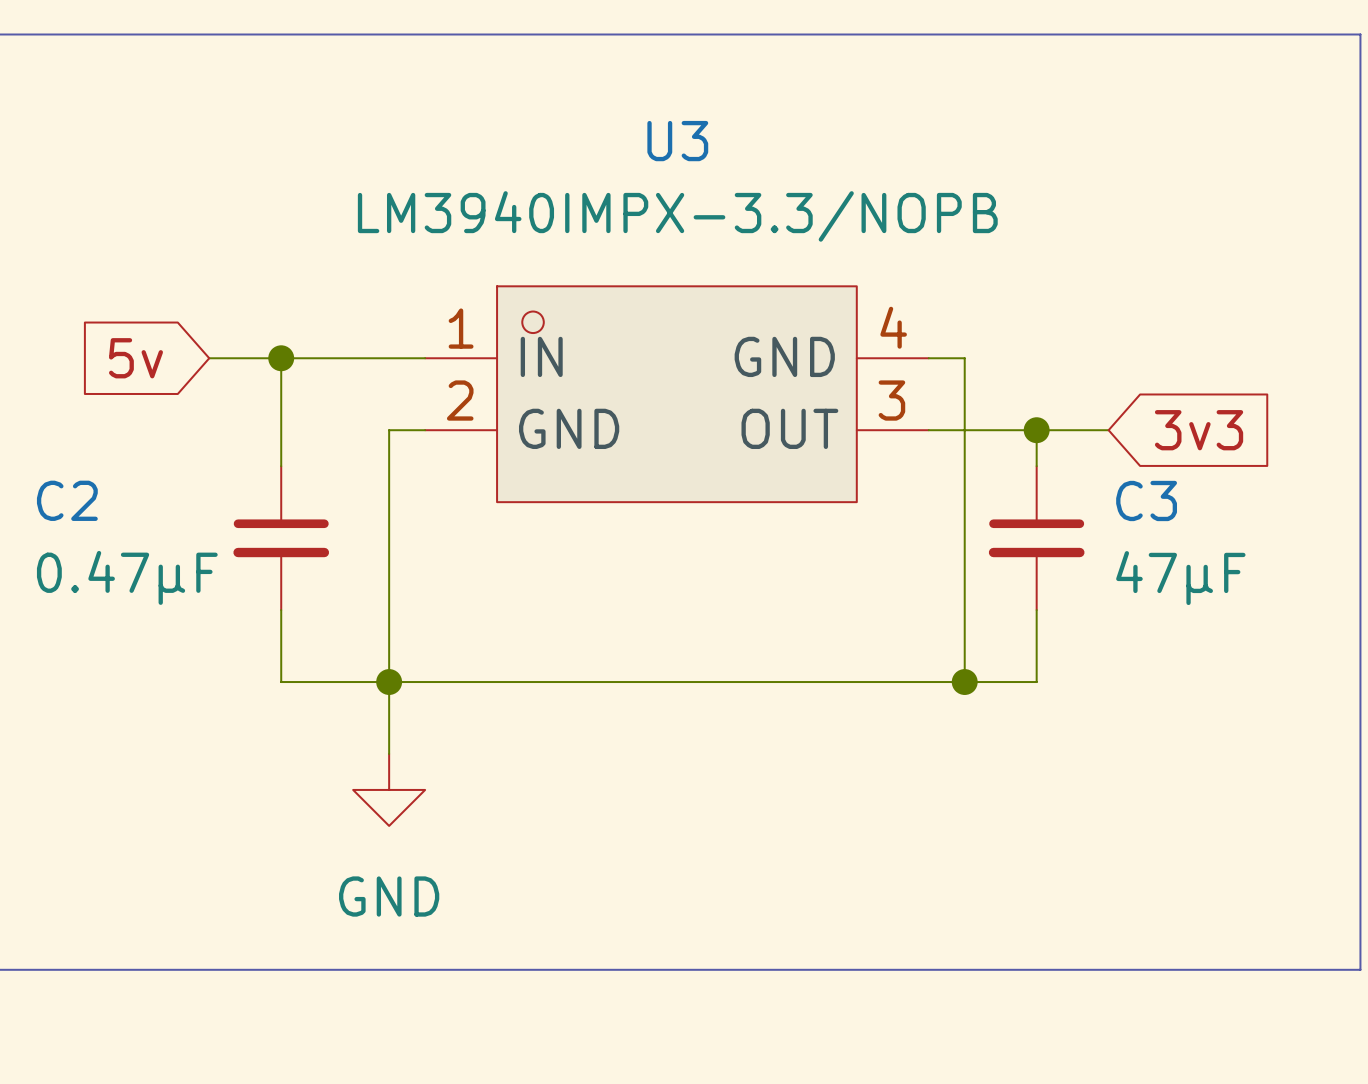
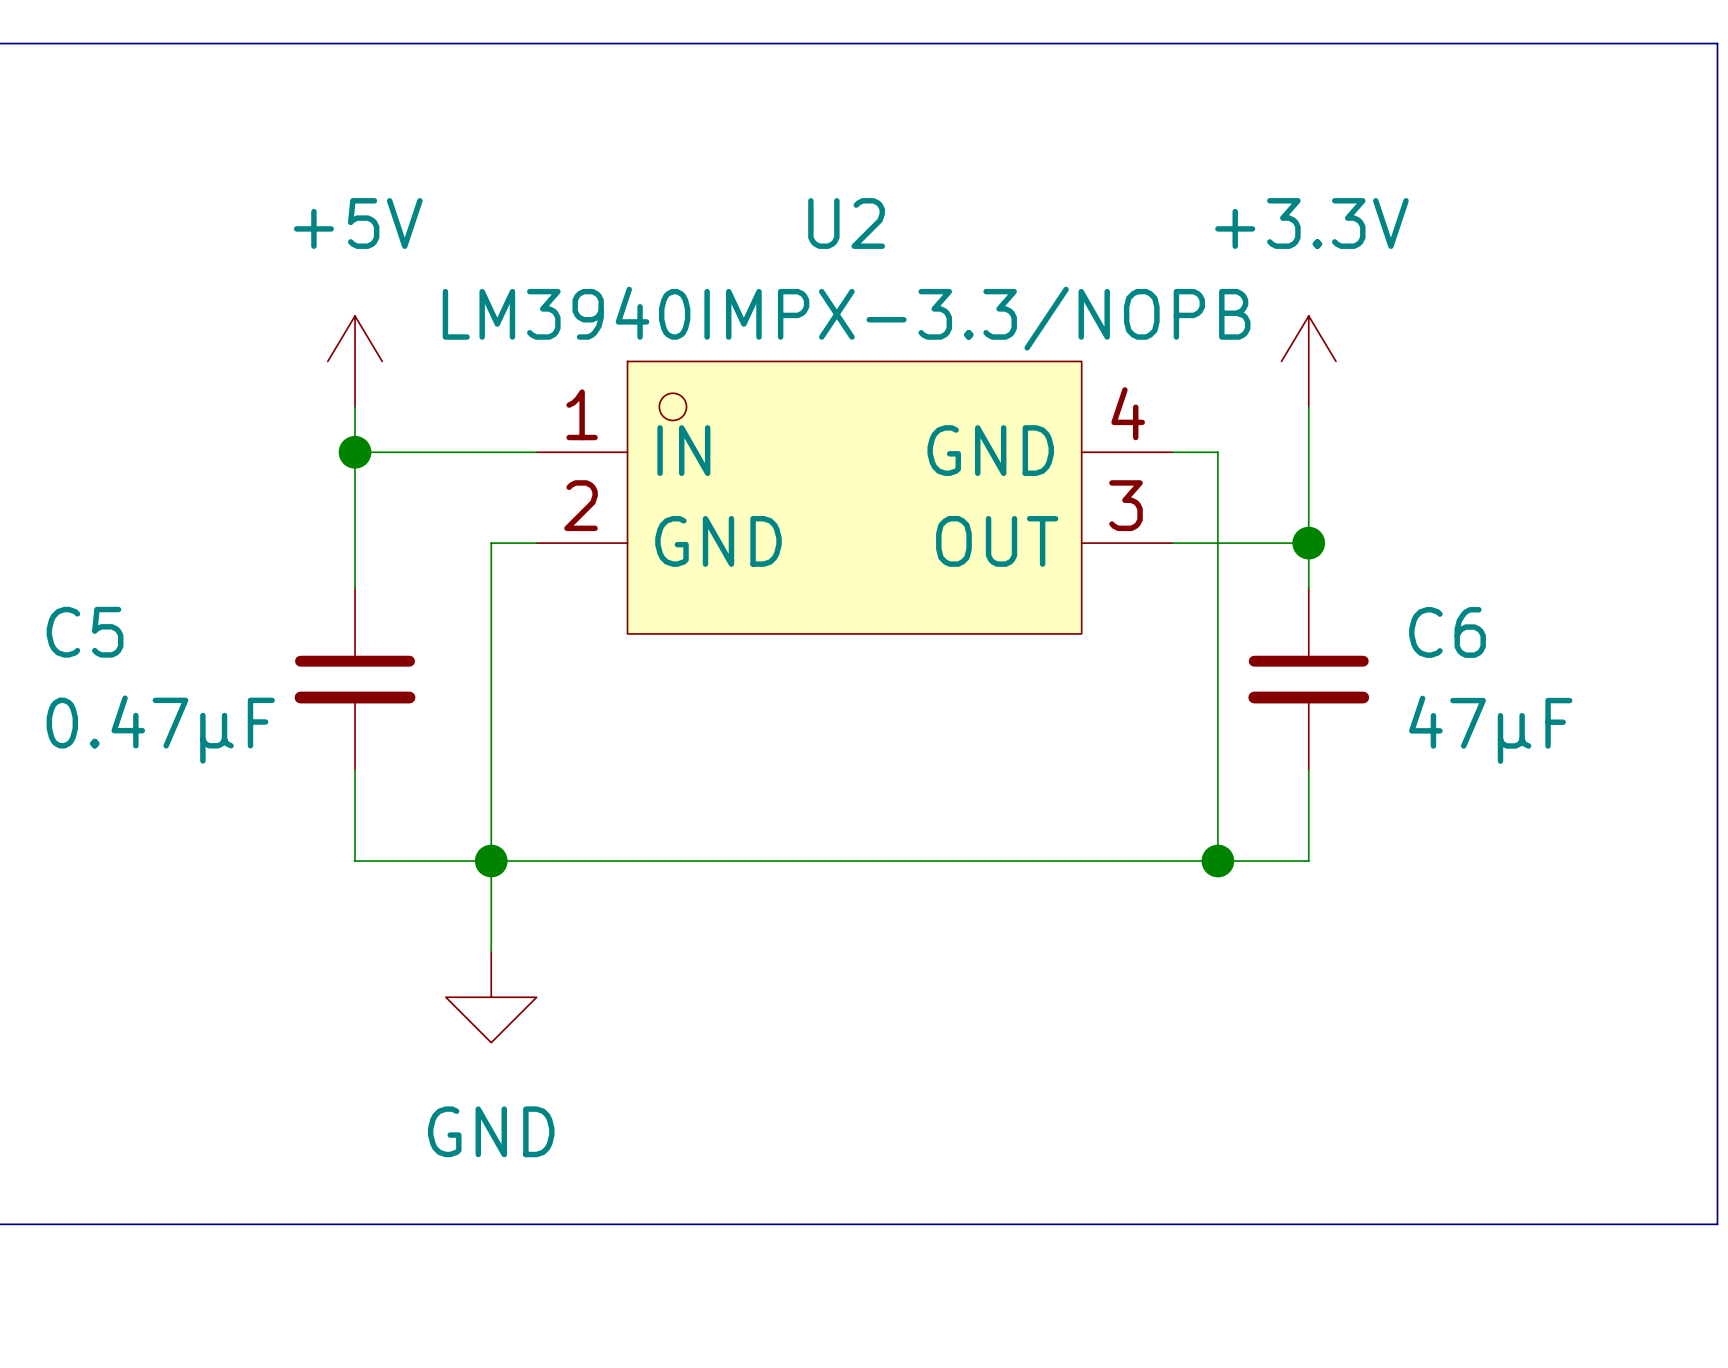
U3 name: U3 (677, 141) -> U2 (846, 223)
U3 value position: LM3940IMPX-3.3/NOPB (677, 216) -> LM3940IMPX-3.3/NOPB (846, 318)
power symbol: none -> +5V (355, 361)
power symbol: none -> +3.3V (1308, 361)
global label: 5v (135, 358) -> none
wire: (209, 358) (281, 358) -> (355, 406) (355, 452)
wire: (1036, 430) (1108, 430) -> (1308, 543) (1308, 406)
global label: 3v3 (1199, 430) -> none
C2 name: C2 (67, 500) -> C5 (85, 632)
C3 name: C3 (1146, 500) -> C6 (1447, 632)

